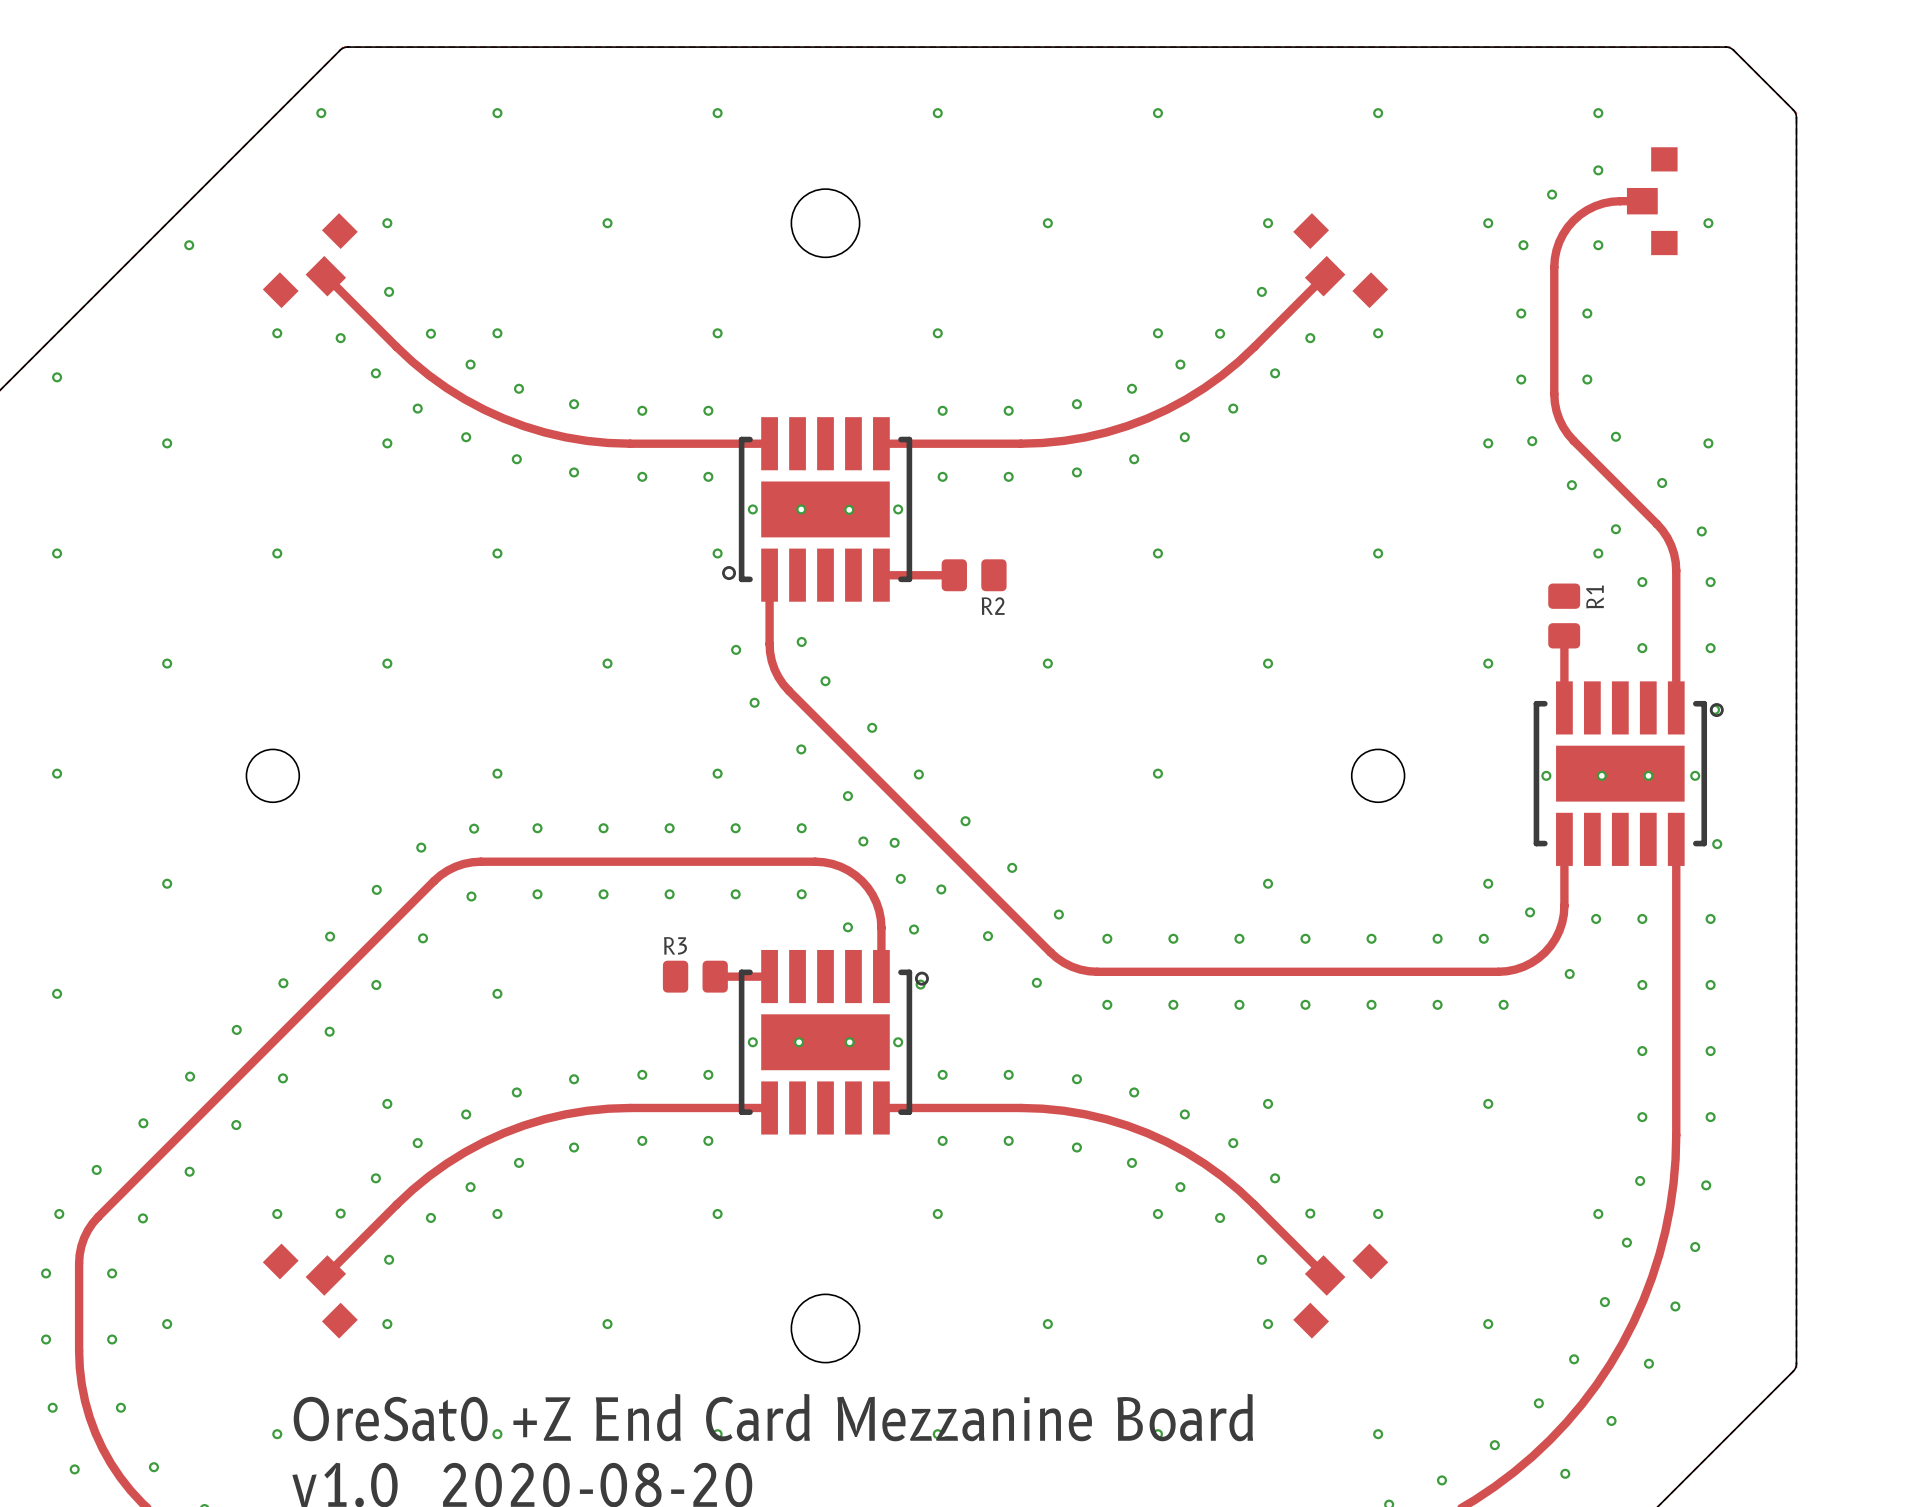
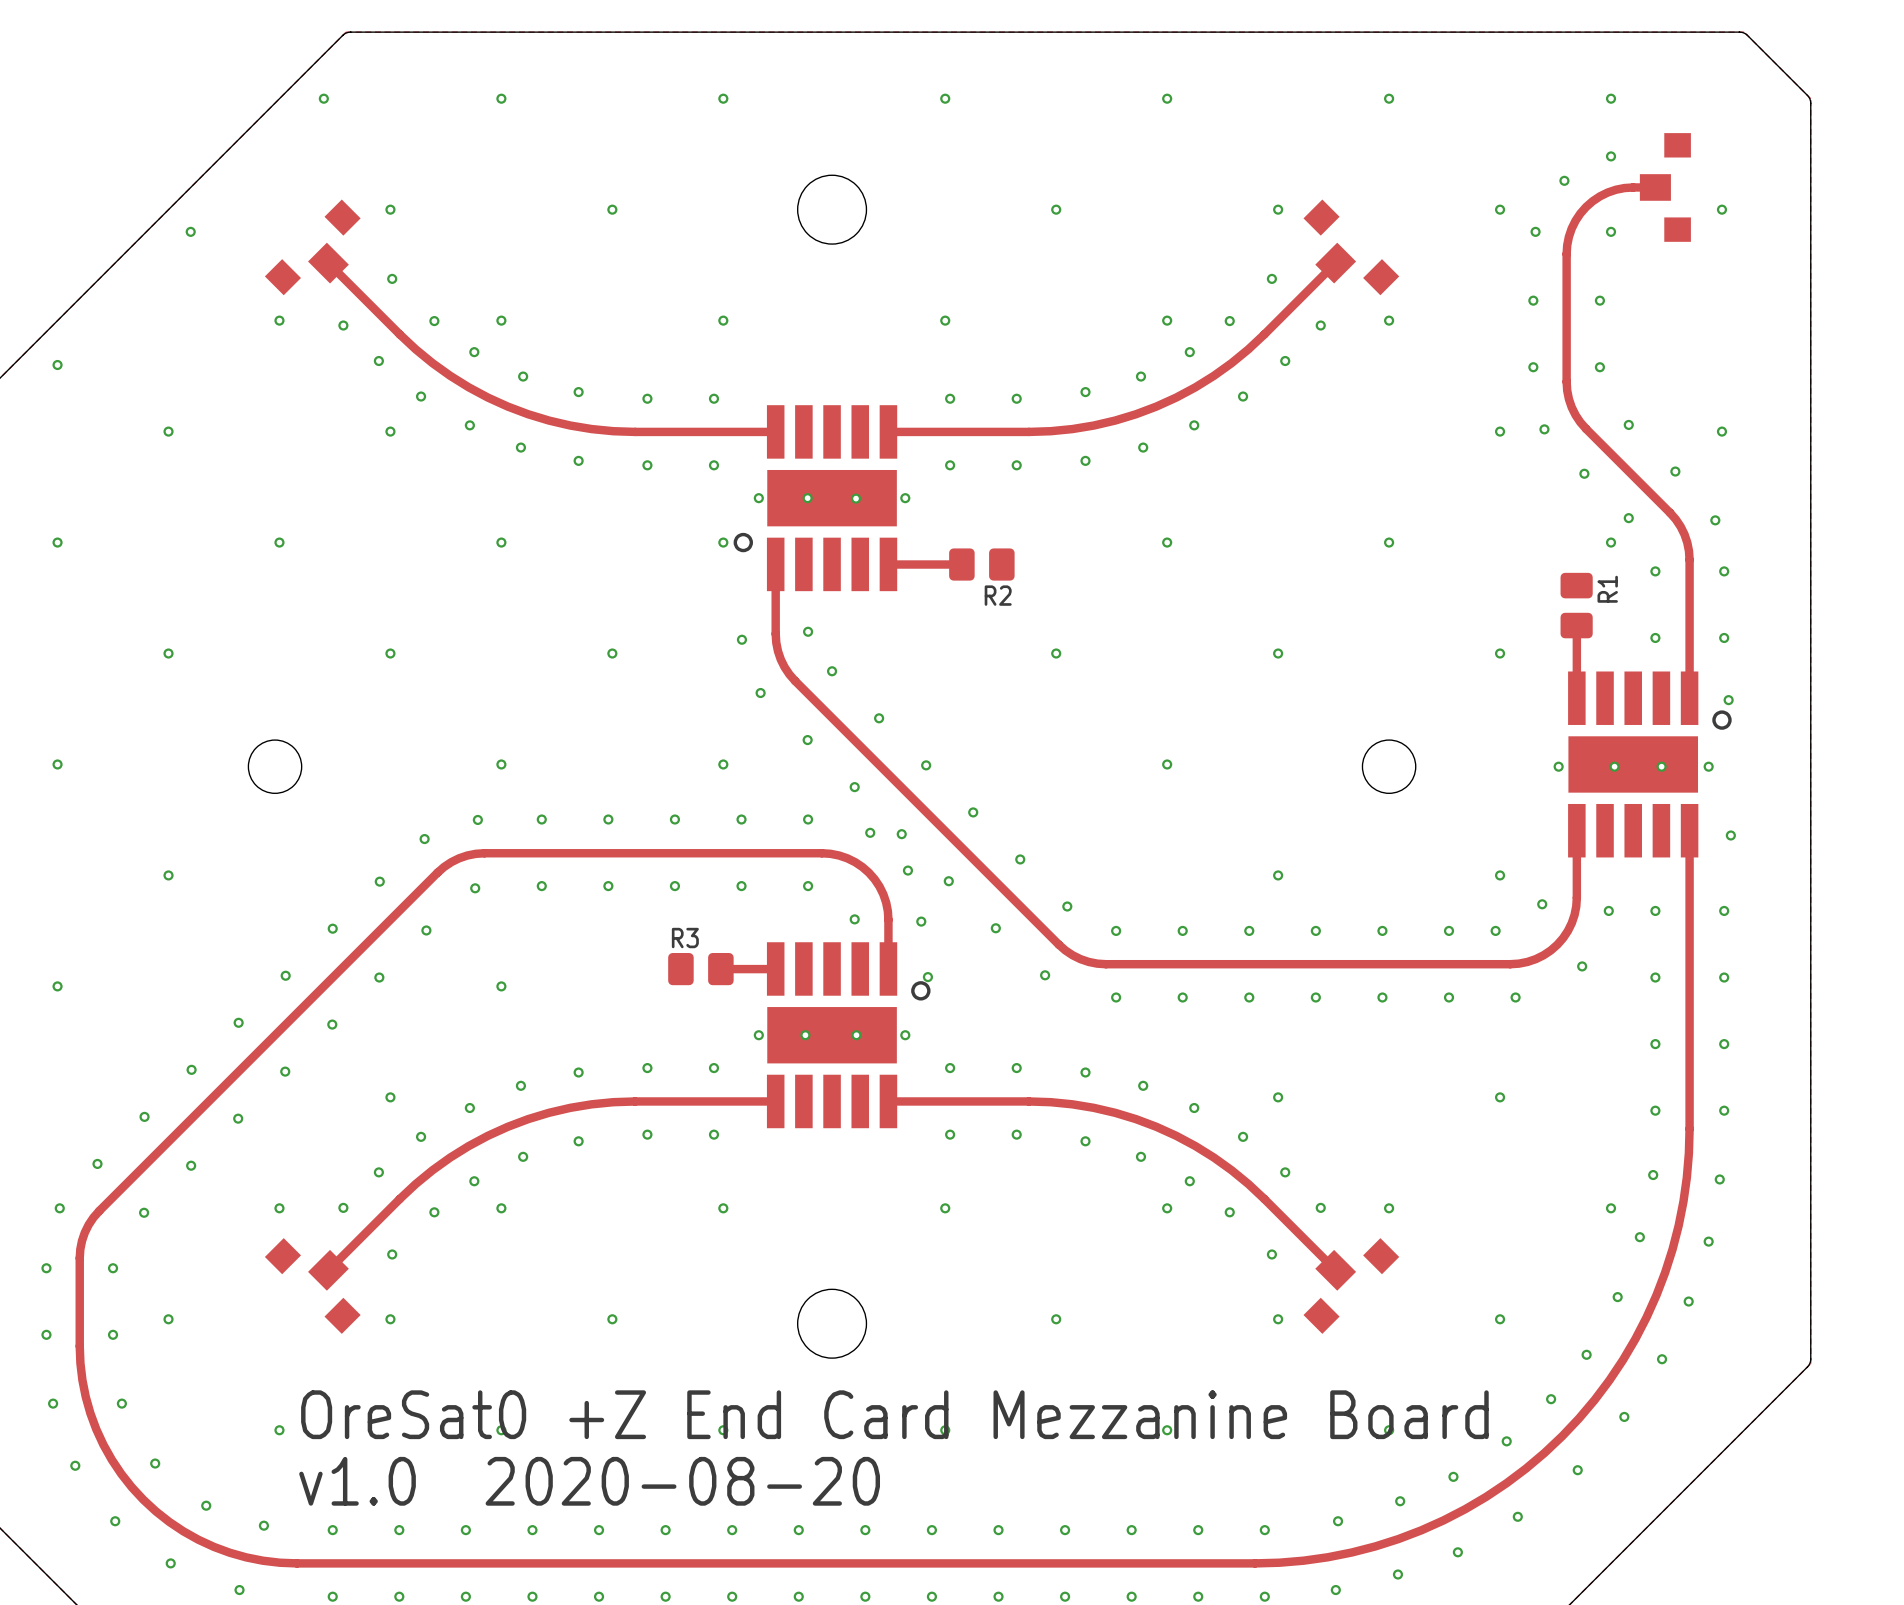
part footprint: [722, 417, 913, 602] -> [733, 405, 898, 592]
part footprint: [1533, 681, 1724, 866] -> [1568, 671, 1732, 858]
part footprint: [738, 949, 929, 1135] -> [766, 942, 931, 1129]

